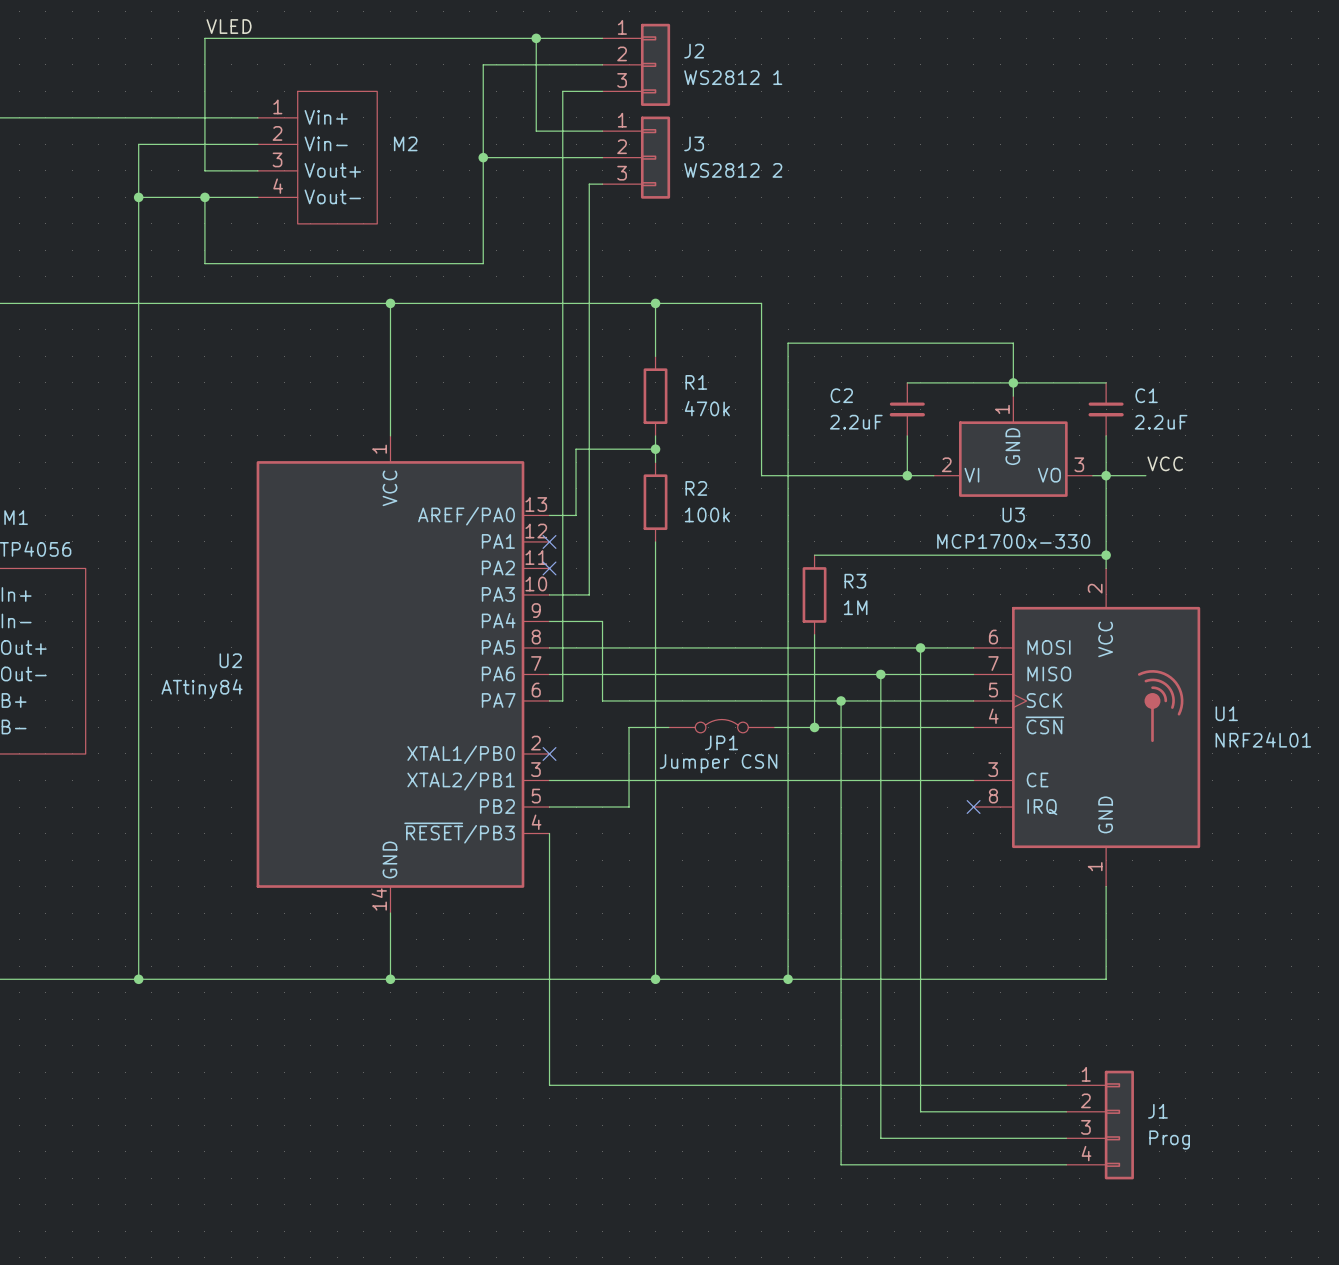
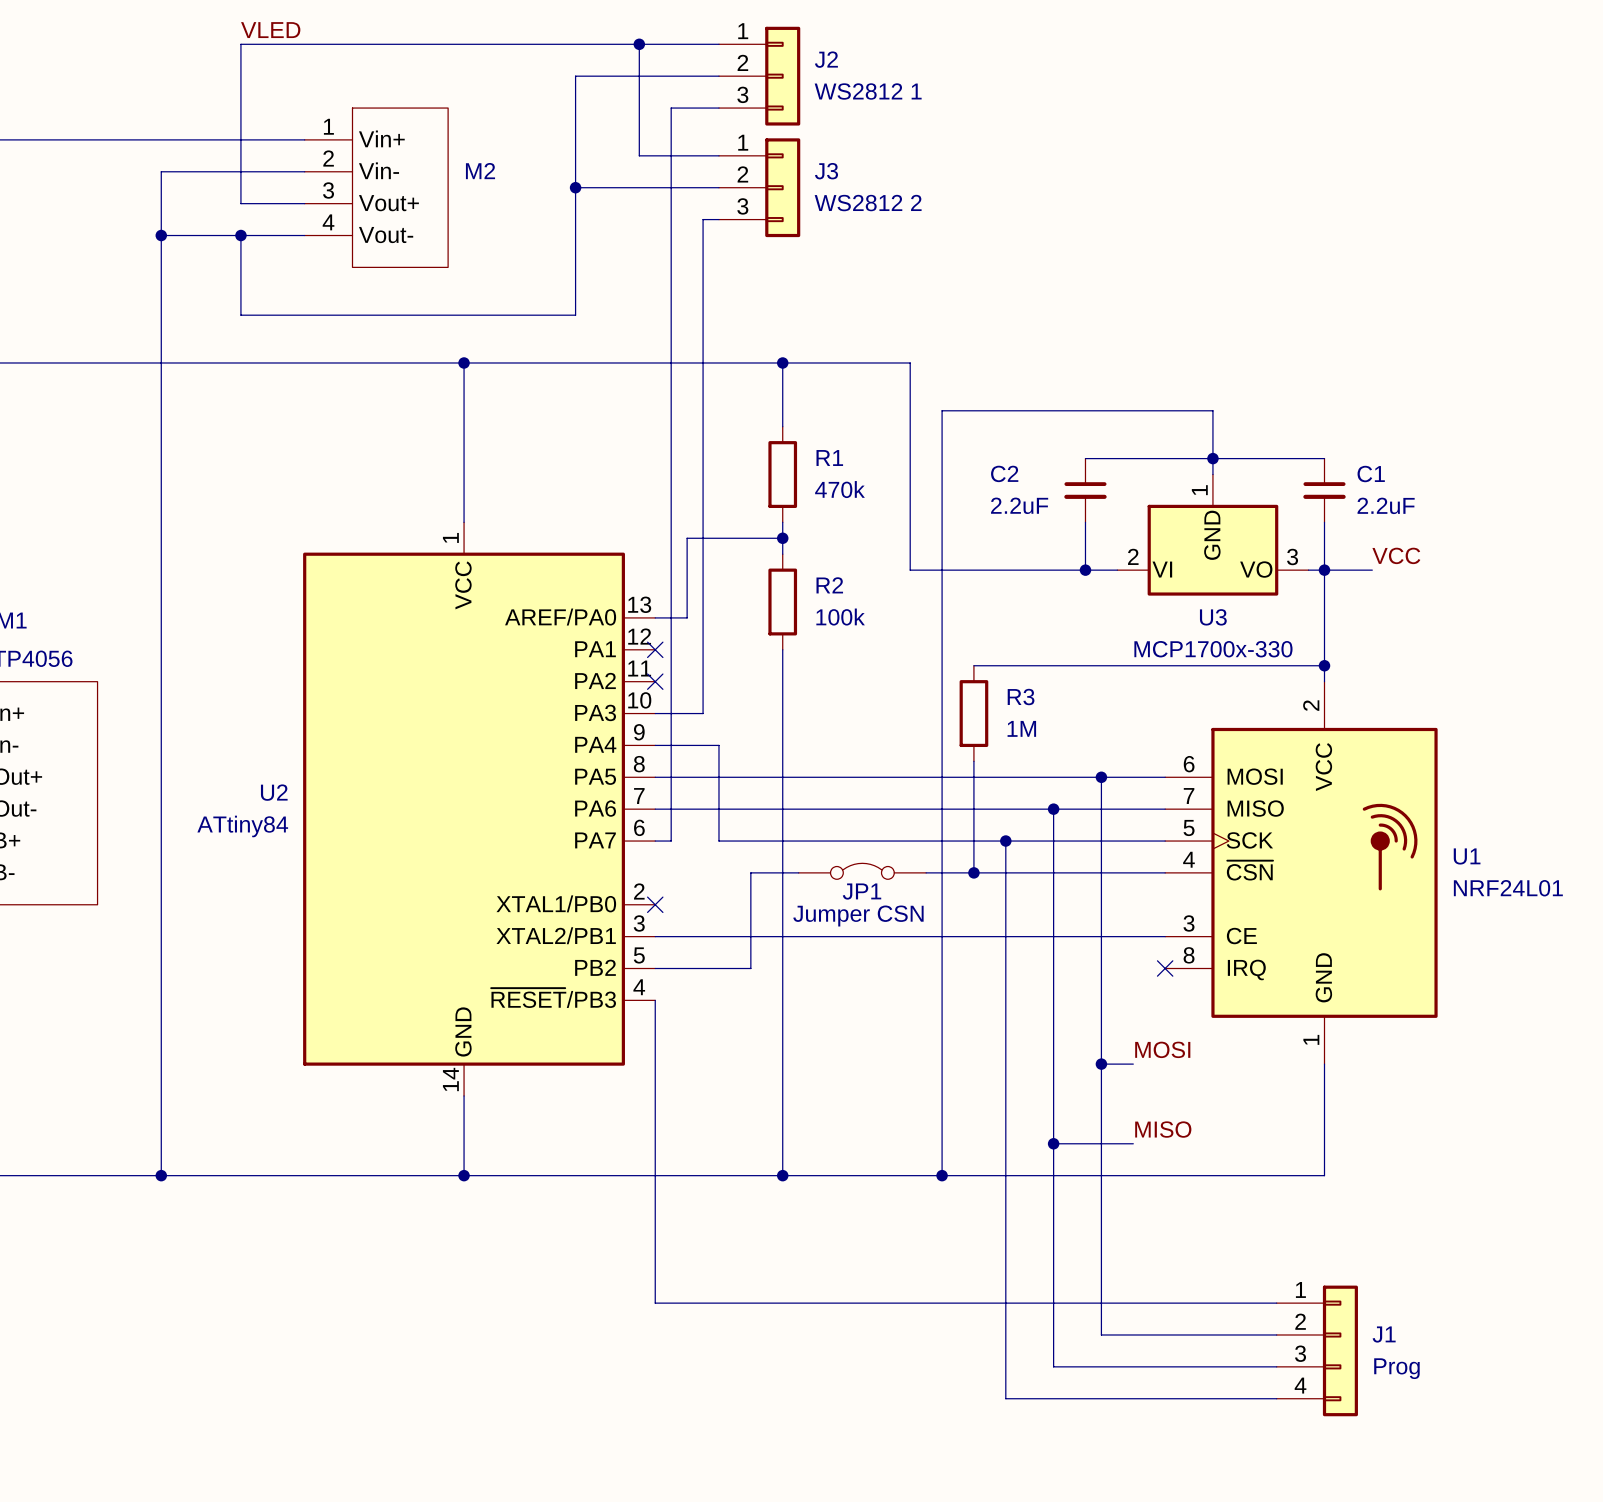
label: none -> MOSI (1162, 1049)
wire: none -> (1101, 1064) (1133, 1064)
junction: none -> (1101, 1064)
label: none -> MISO (1163, 1129)
wire: none -> (1053, 1143) (1133, 1143)
junction: none -> (1053, 1143)

